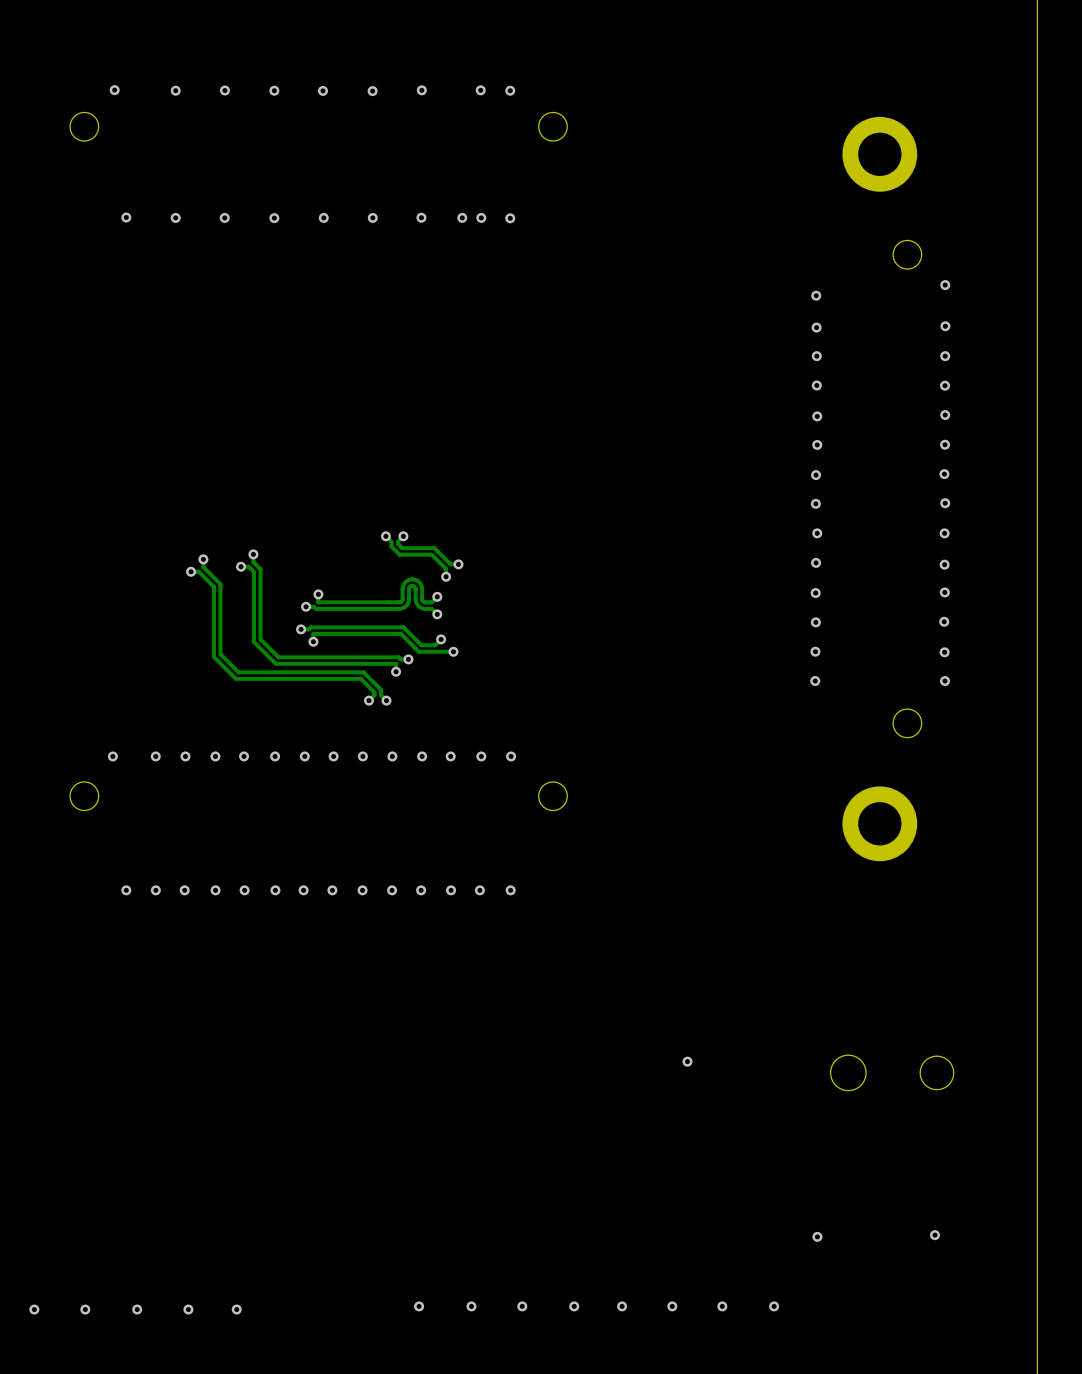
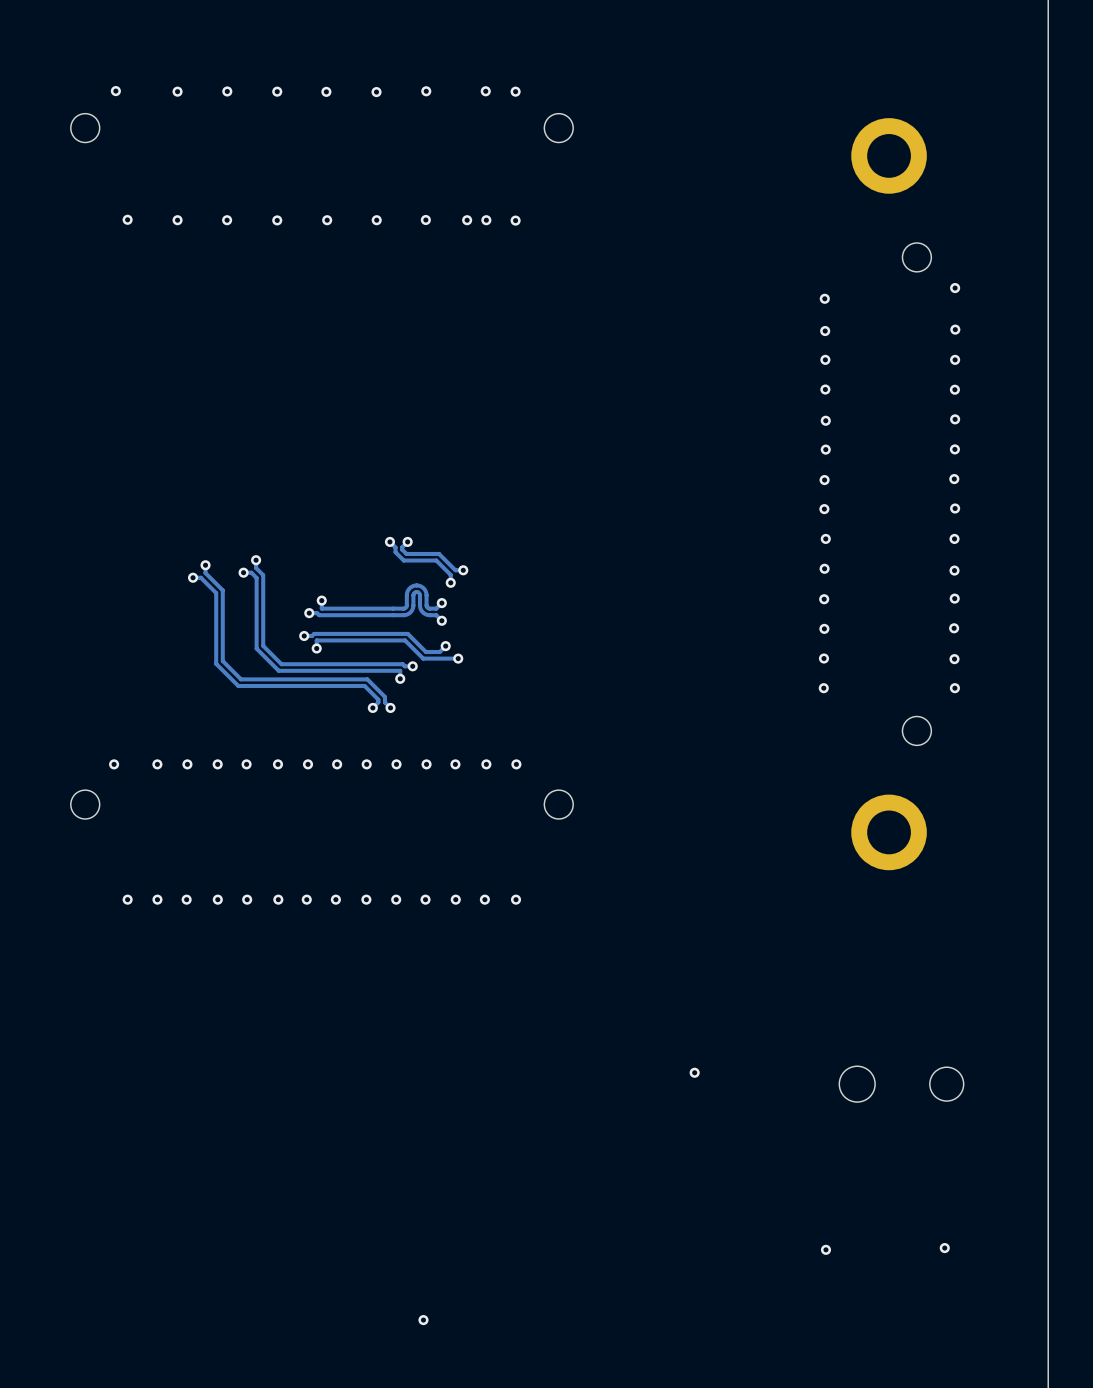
via: (471, 1306) -> none
via: (522, 1306) -> none
via: (574, 1306) -> none
via: (622, 1306) -> none
via: (672, 1306) -> none
via: (722, 1306) -> none
via: (774, 1306) -> none
via: (34, 1309) -> none
via: (85, 1309) -> none
via: (137, 1309) -> none
via: (188, 1309) -> none
via: (236, 1309) -> none

